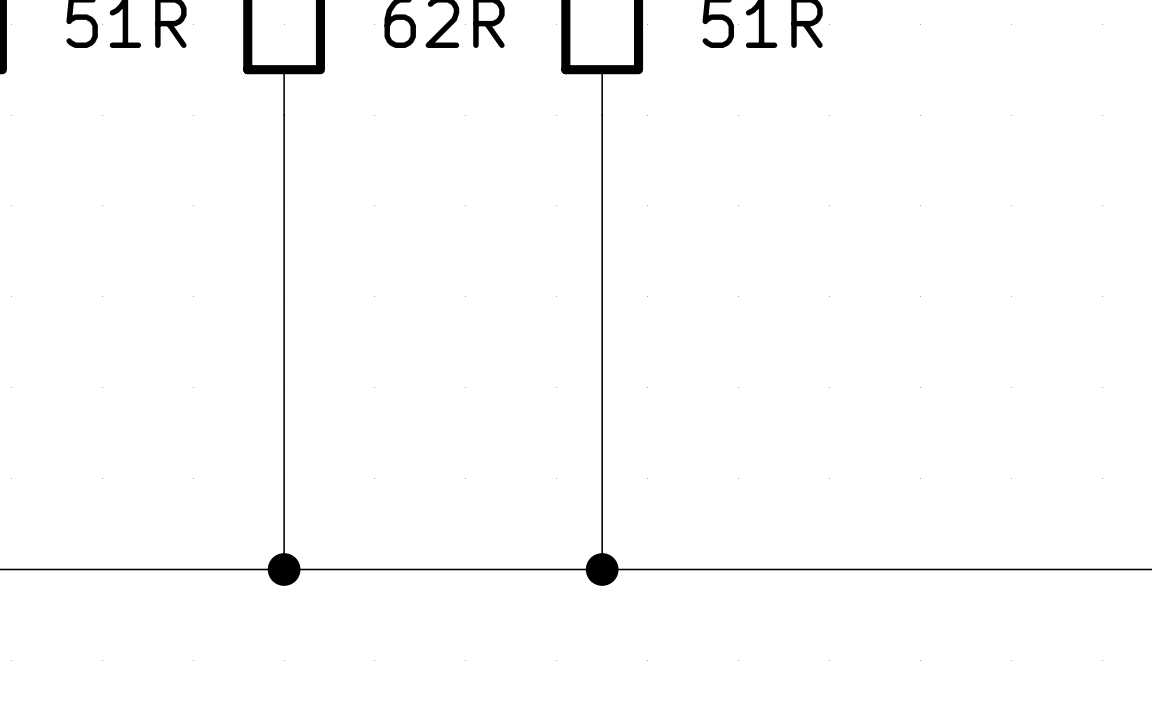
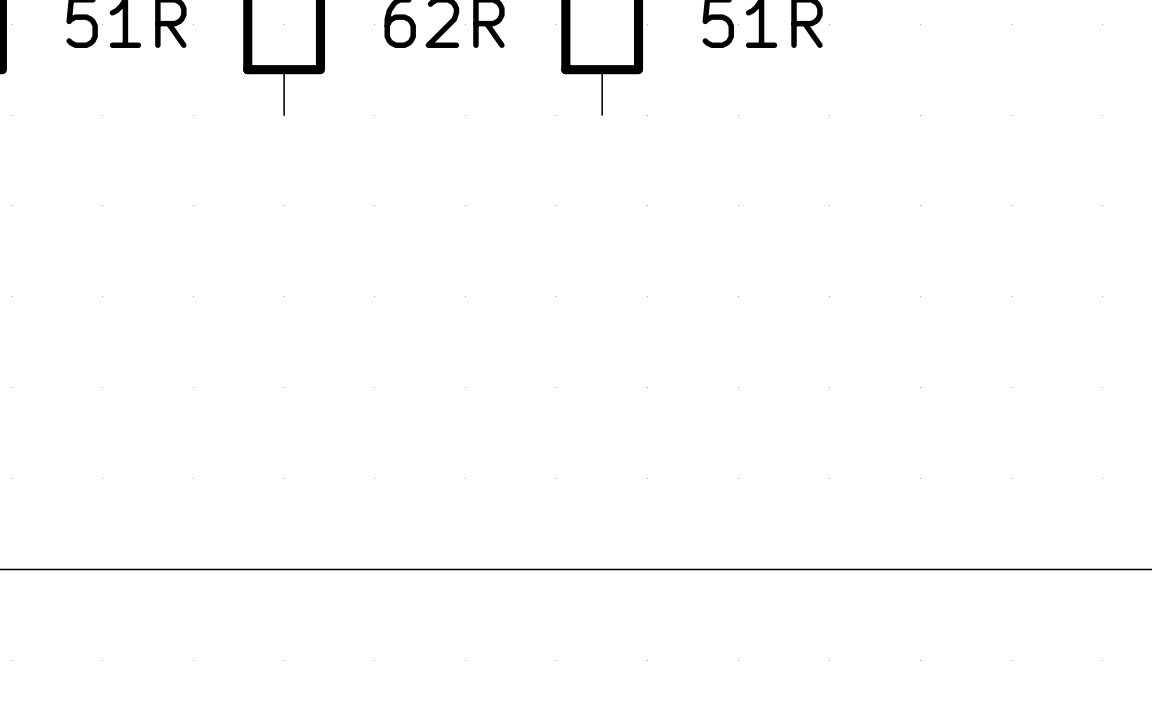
wire: (284, 115) (284, 569) -> none
wire: (602, 115) (602, 569) -> none
junction: (284, 569) -> none
junction: (602, 569) -> none

